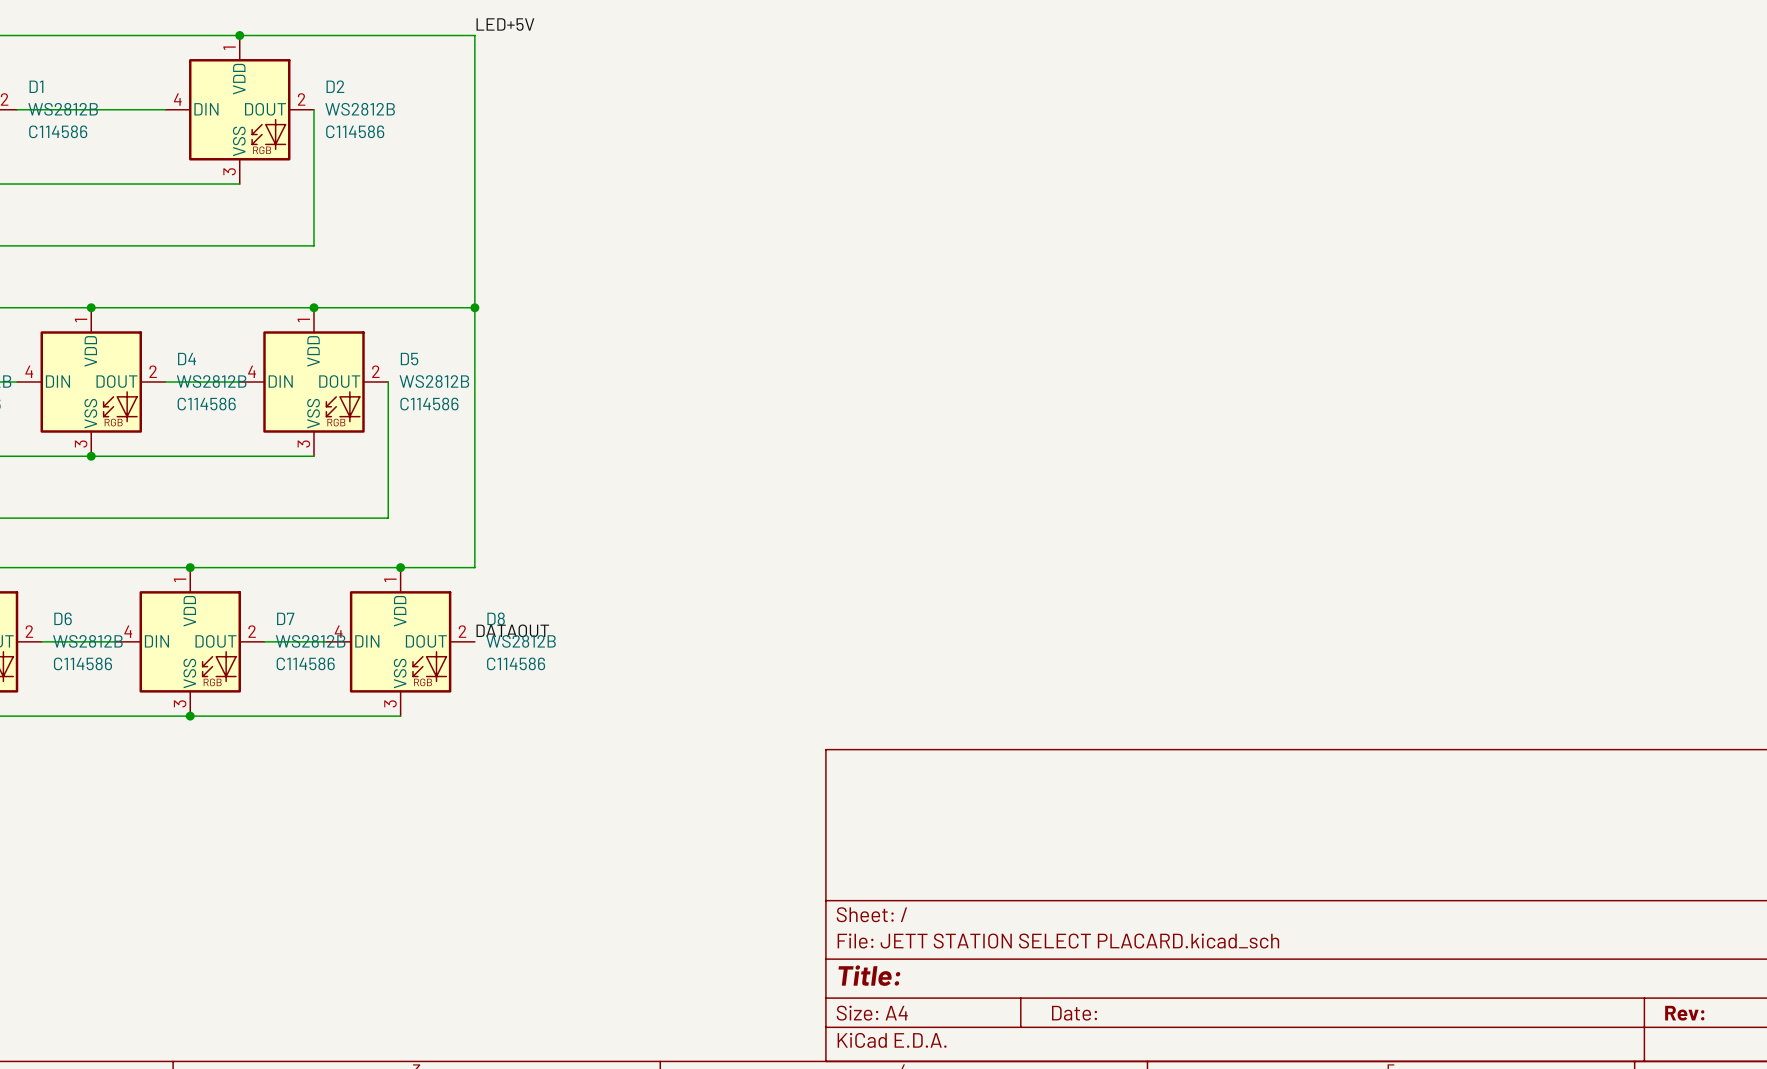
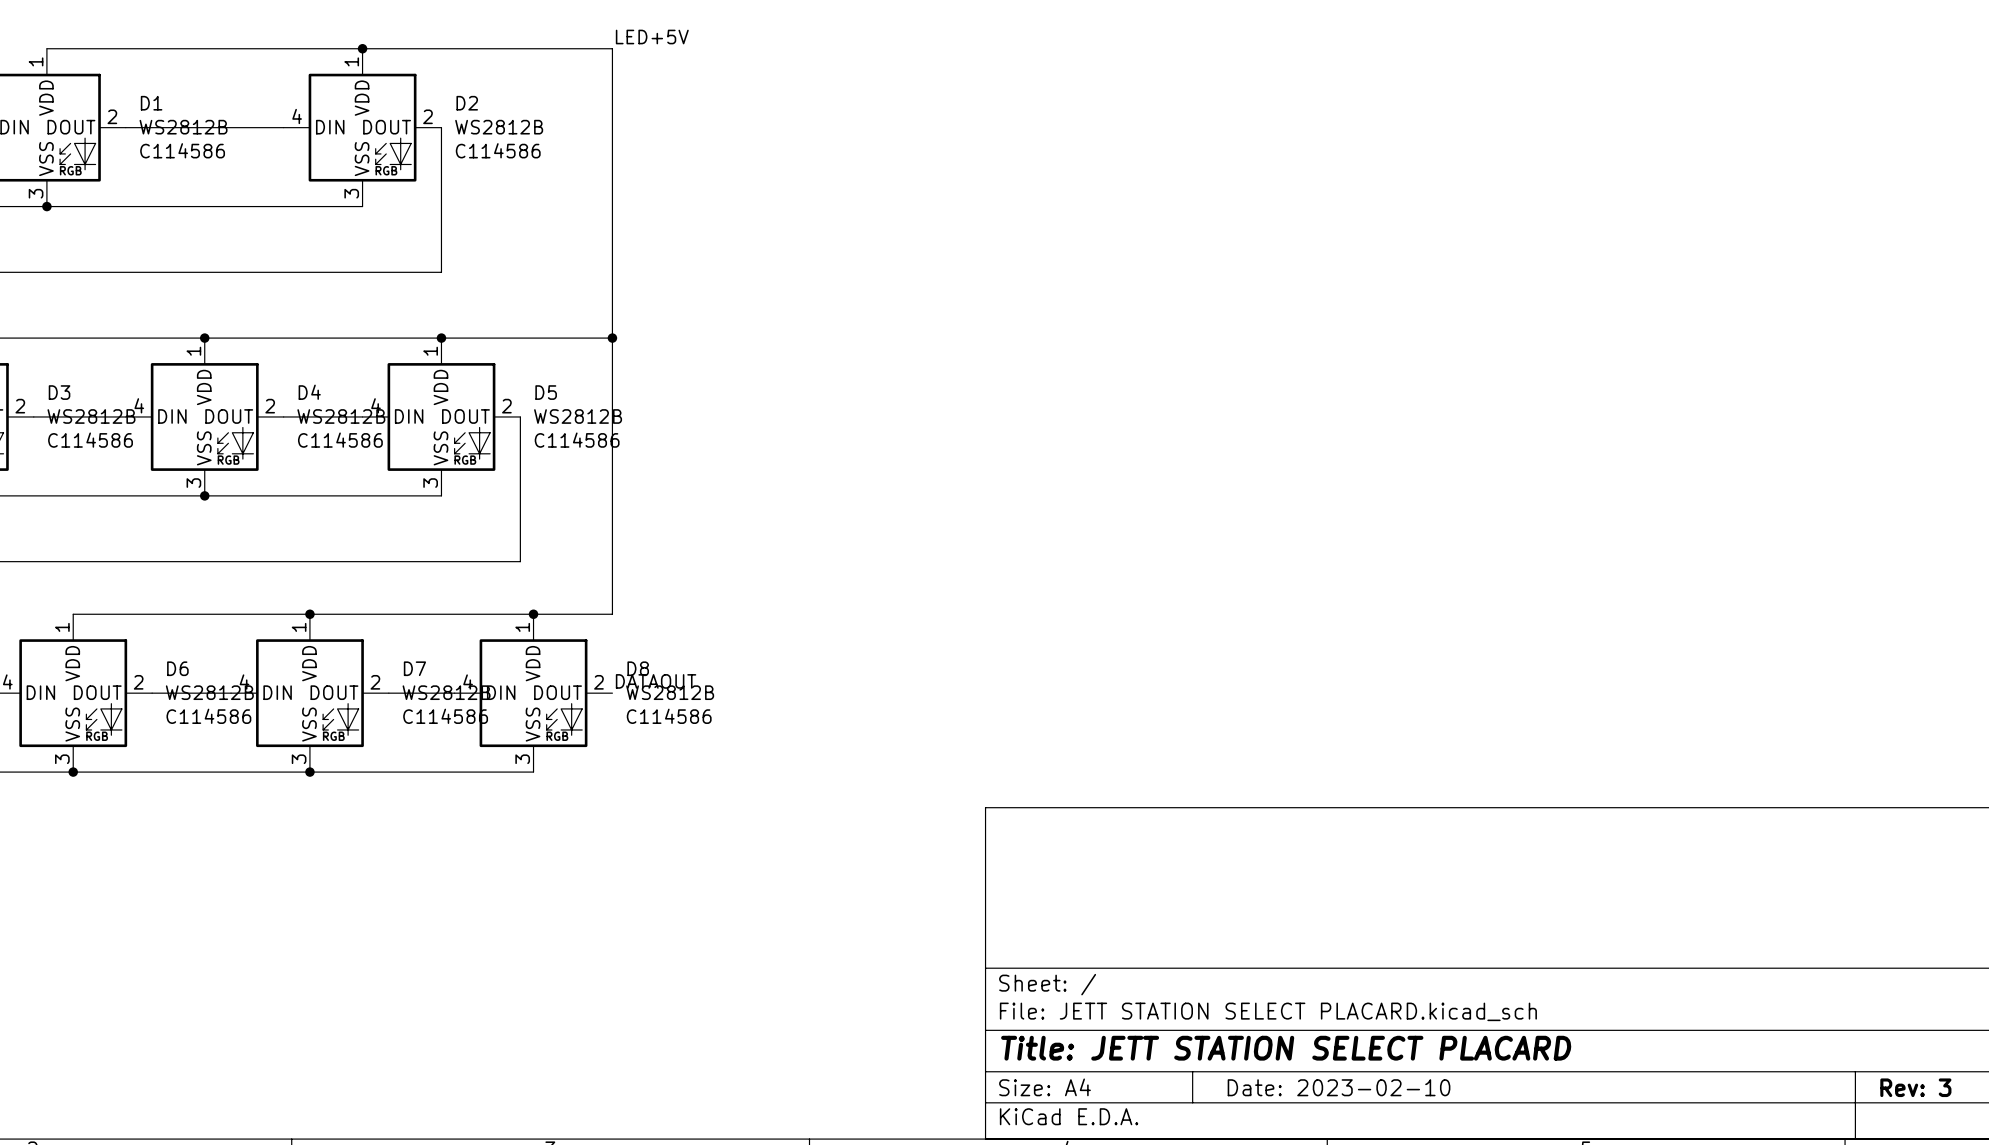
title block: Title: (869, 975) -> Title: JETT STATION SELECT PLACARD (1286, 1048)
title block: Date: (1074, 1013) -> Date: 2023-02-10 (1339, 1087)
title block: Rev: (1684, 1013) -> Rev: 3 (1915, 1087)

